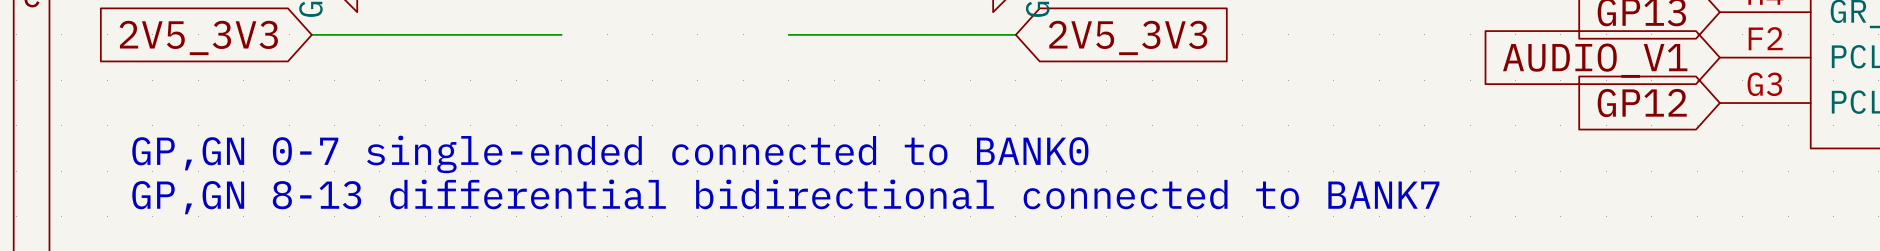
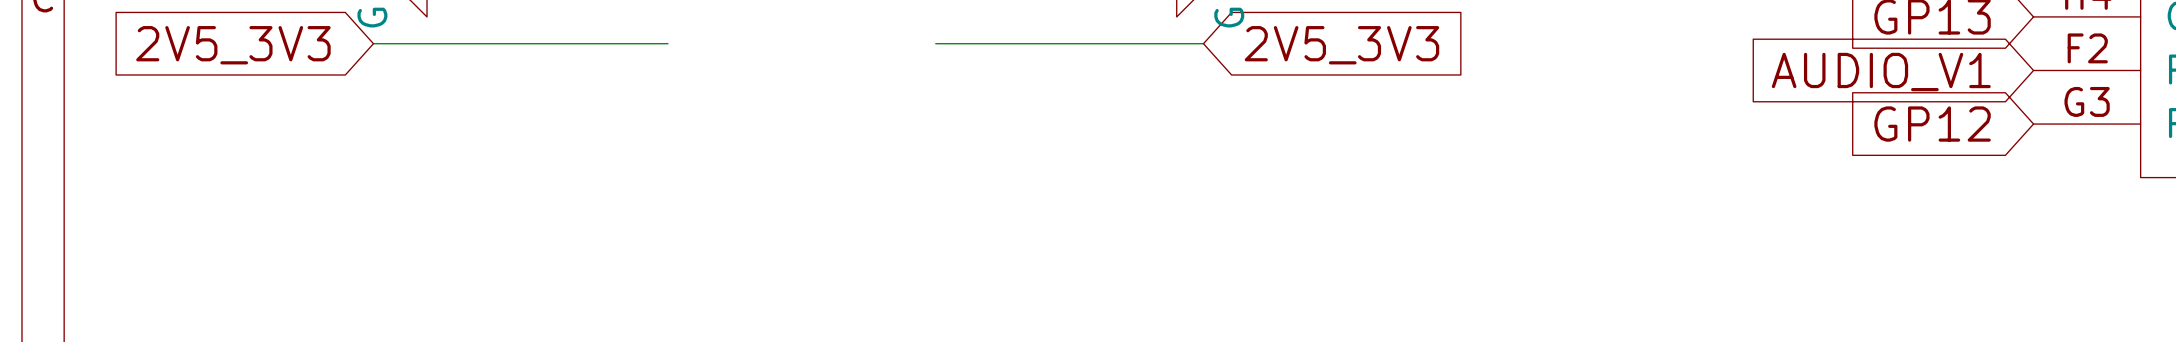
text: GP,GN 0-7 single-ended connected to BANK0 (610, 154) -> none
text: GP,GN 8-13 differential bidirectional connected to BANK7 (785, 196) -> none

